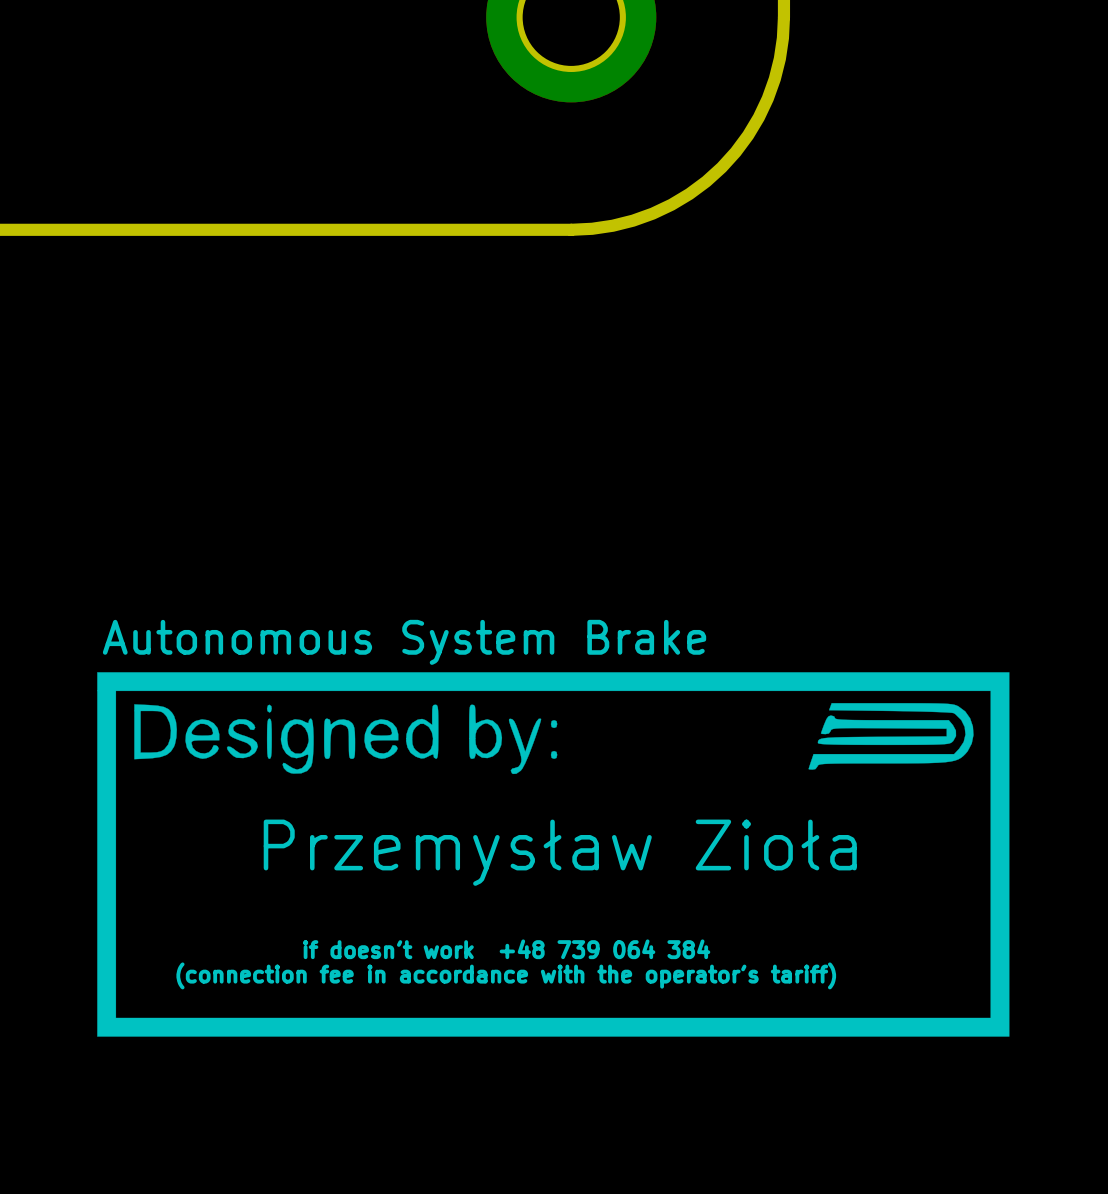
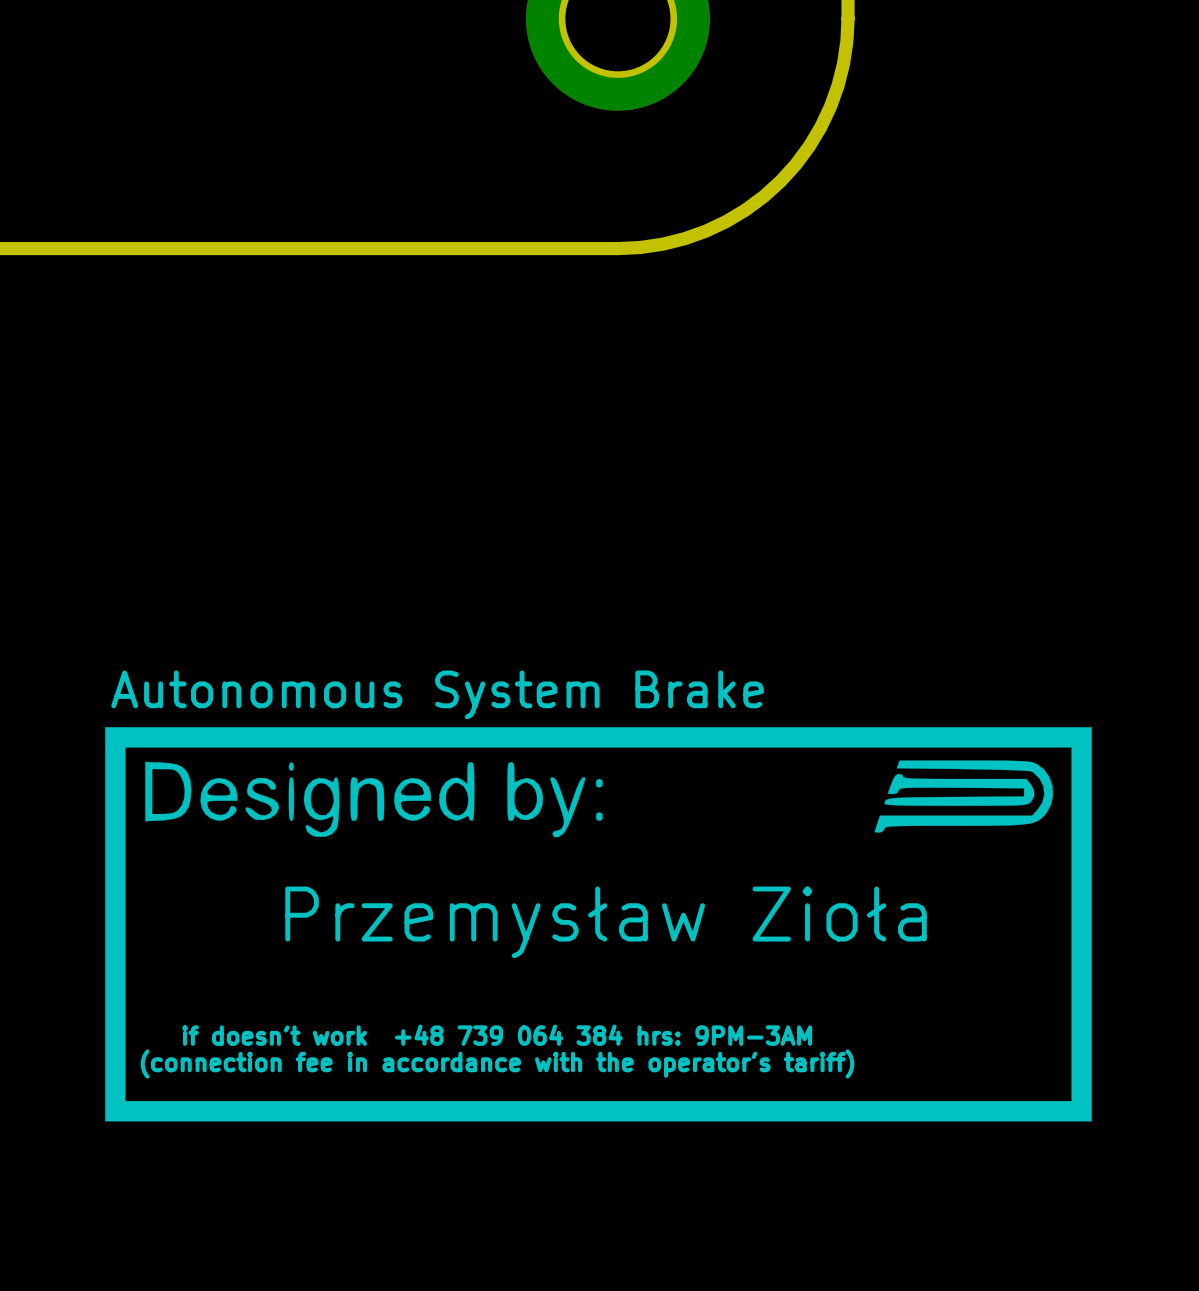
text: if doesn't work +48 739 064 384 (506, 949) -> if doesn't work +48 739 064 384 hrs: 9PM-3AM (497, 1035)
text position: (connection fee in accordance with the operator's tariff) (506, 975) -> (connection fee in accordance with the operator's tariff) (497, 1063)

